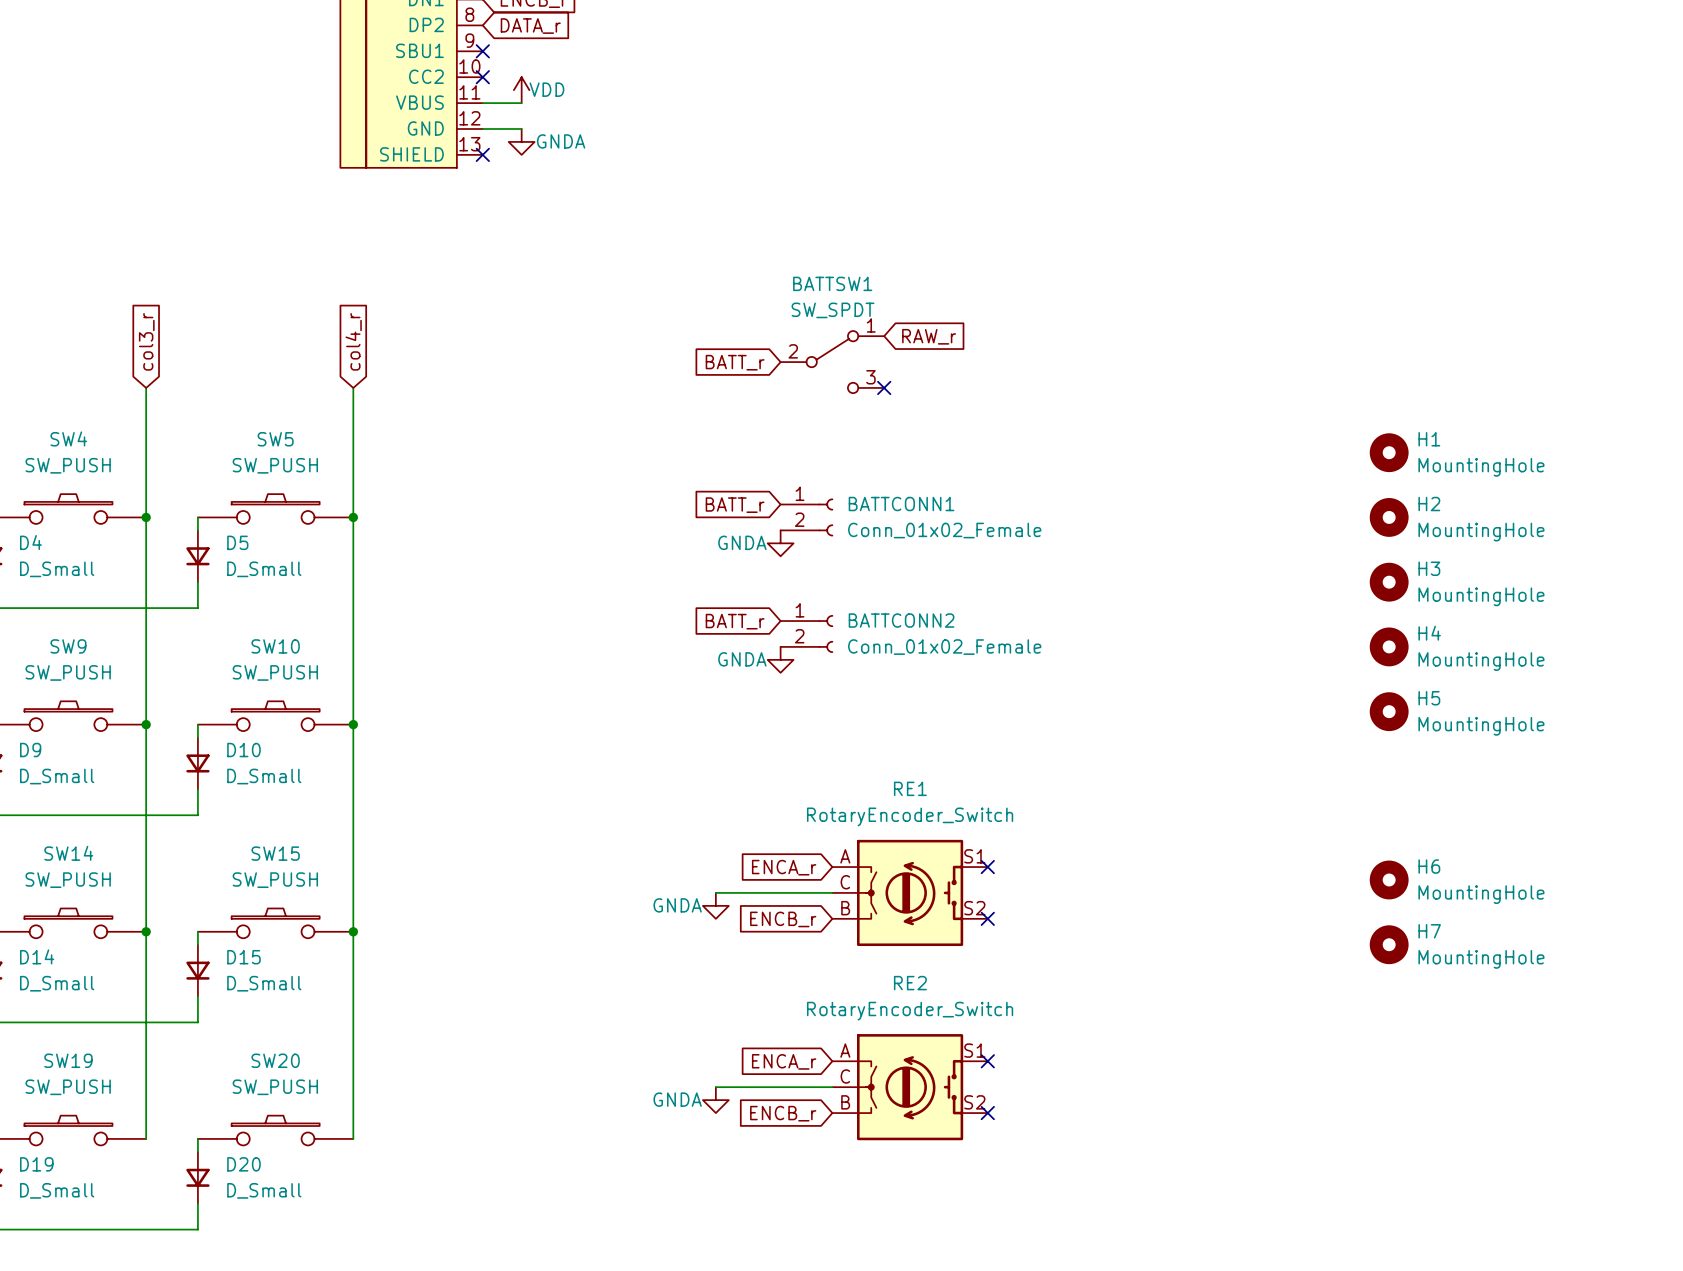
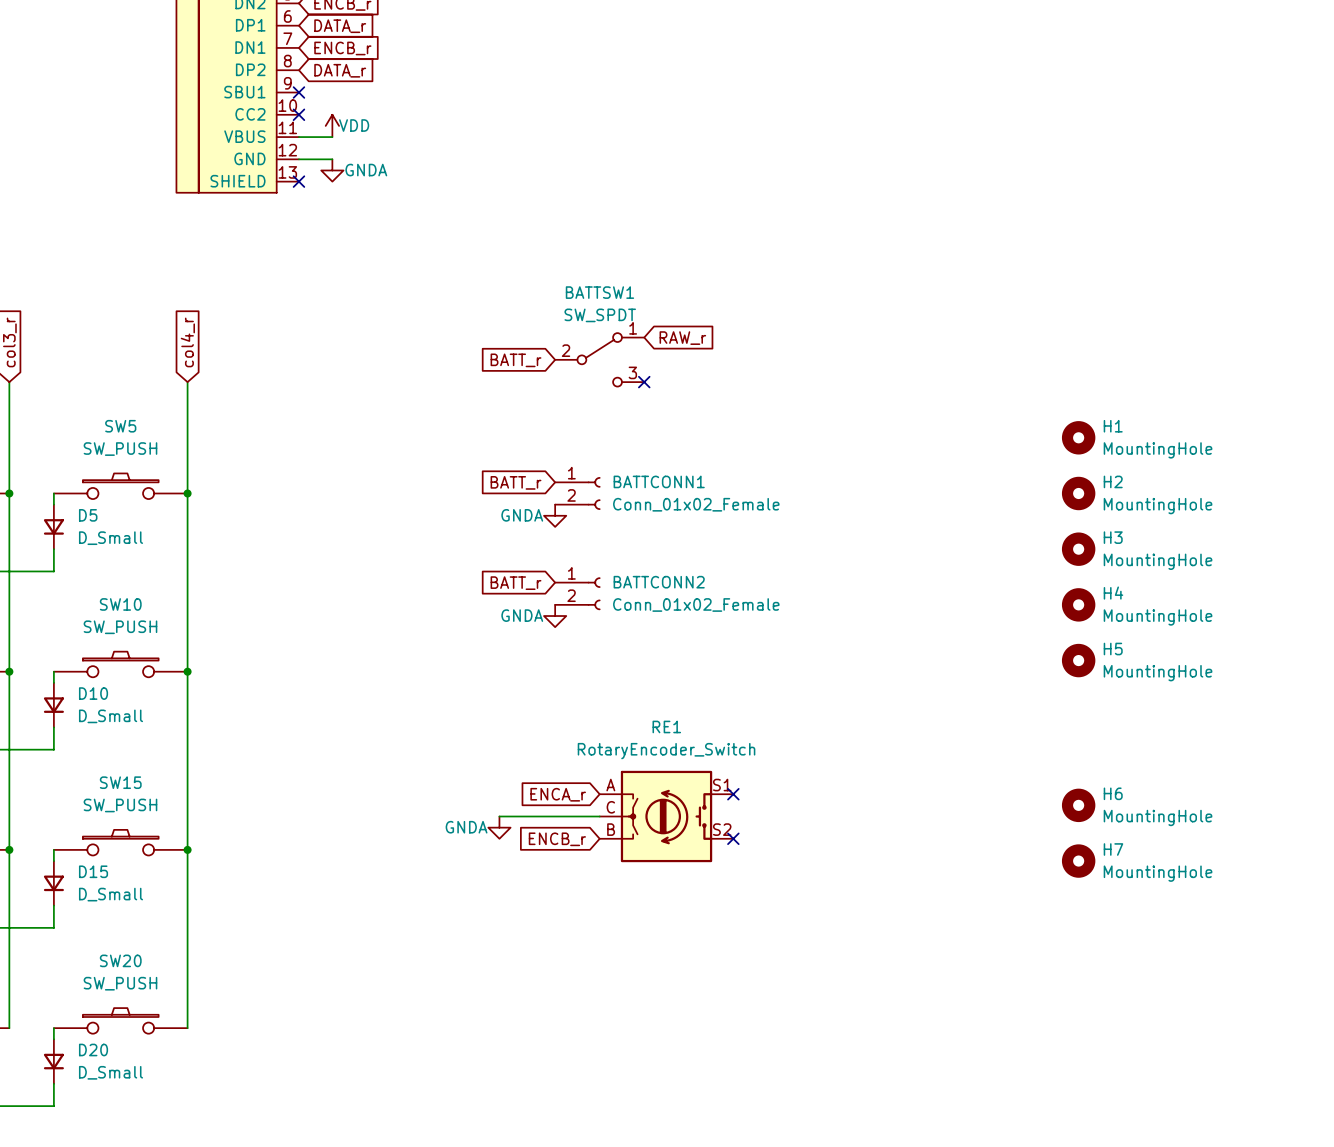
global label: ENCA_r (784, 1061) -> none
no-connect mark: (987, 1061) -> none
wire: (715, 1087) (832, 1087) -> none
RE2: RotaryEncoder_Switch (910, 1087) -> none
power symbol: GNDA (715, 1100) -> none
global label: ENCB_r (783, 1113) -> none
no-connect mark: (987, 1113) -> none

